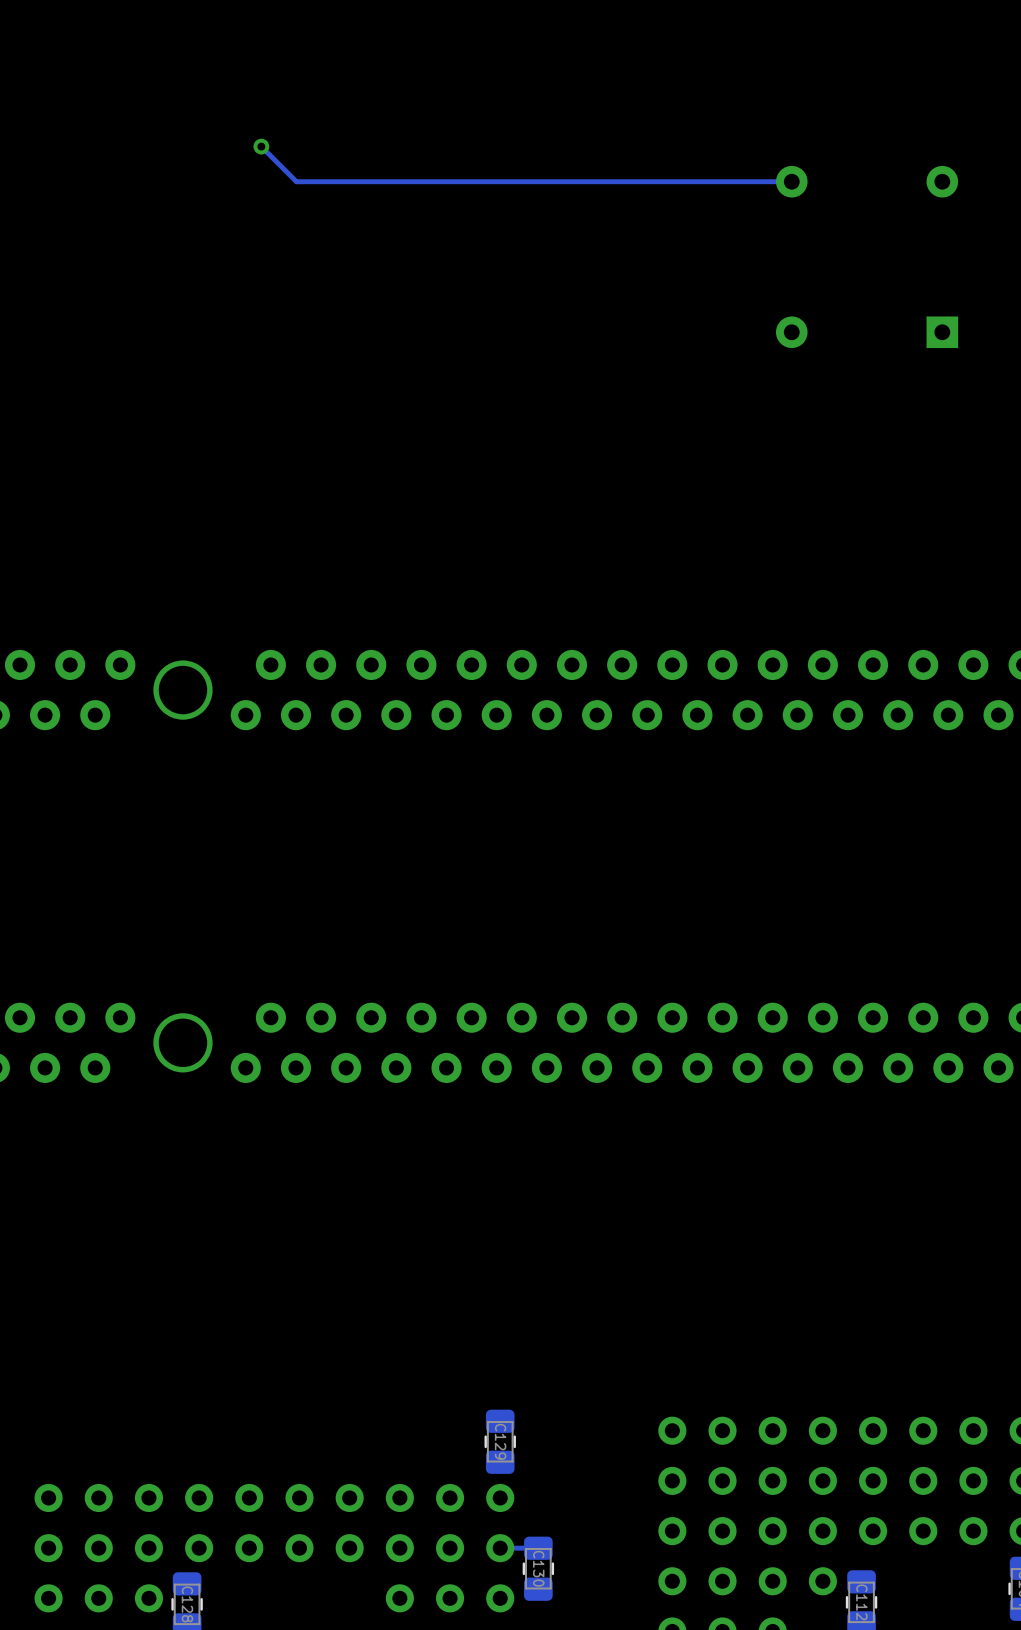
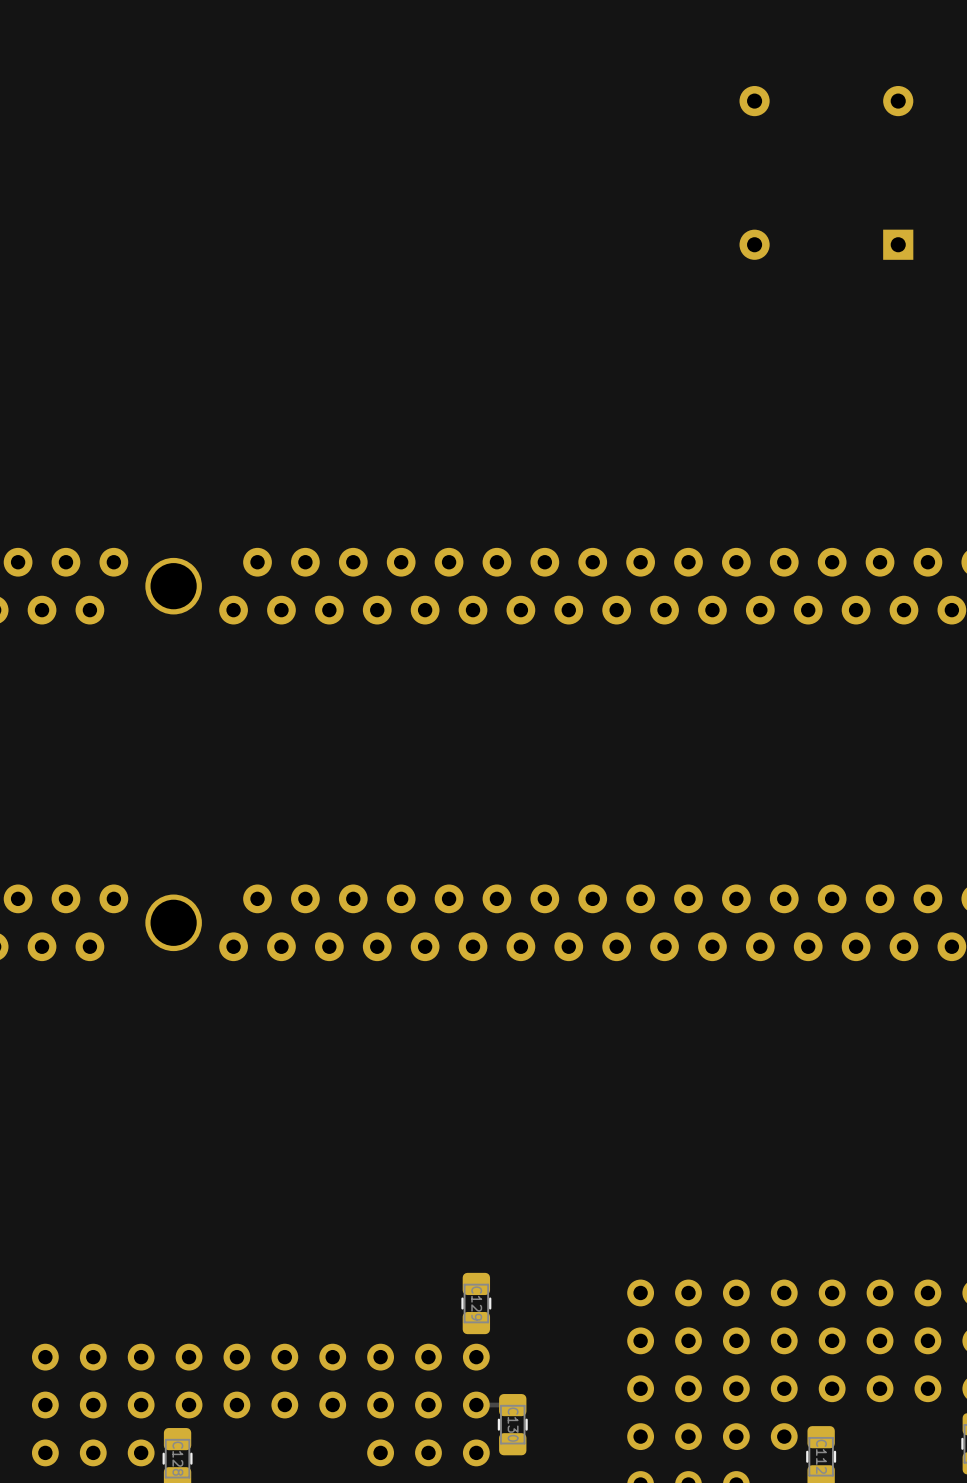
track: (261, 146) (296, 181) (791, 181) -> none
via: (261, 146) -> none

